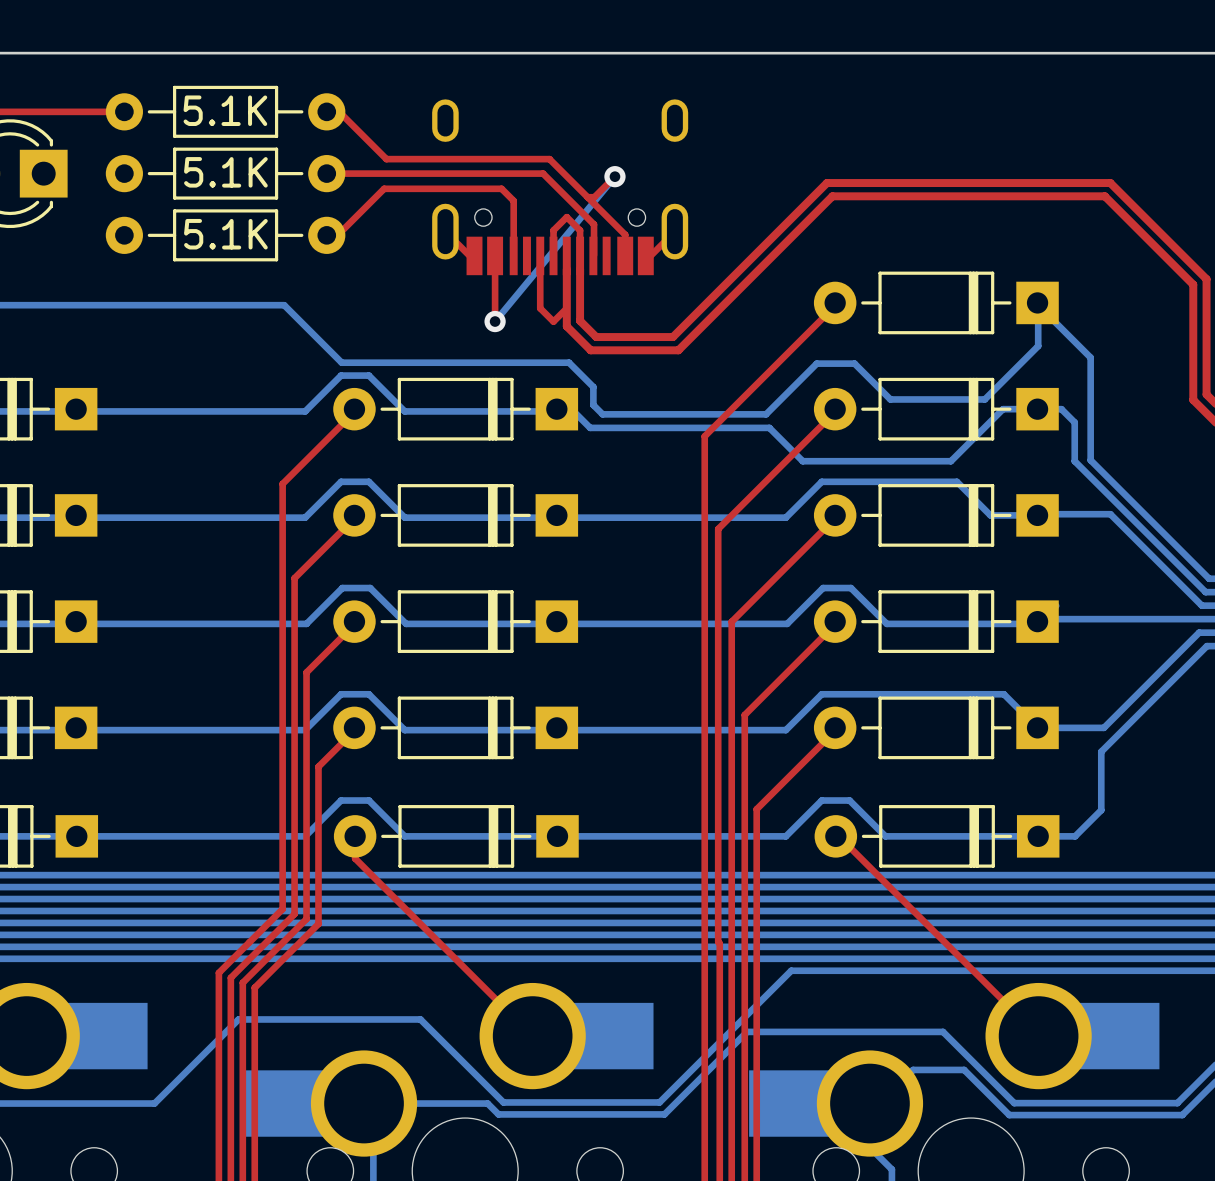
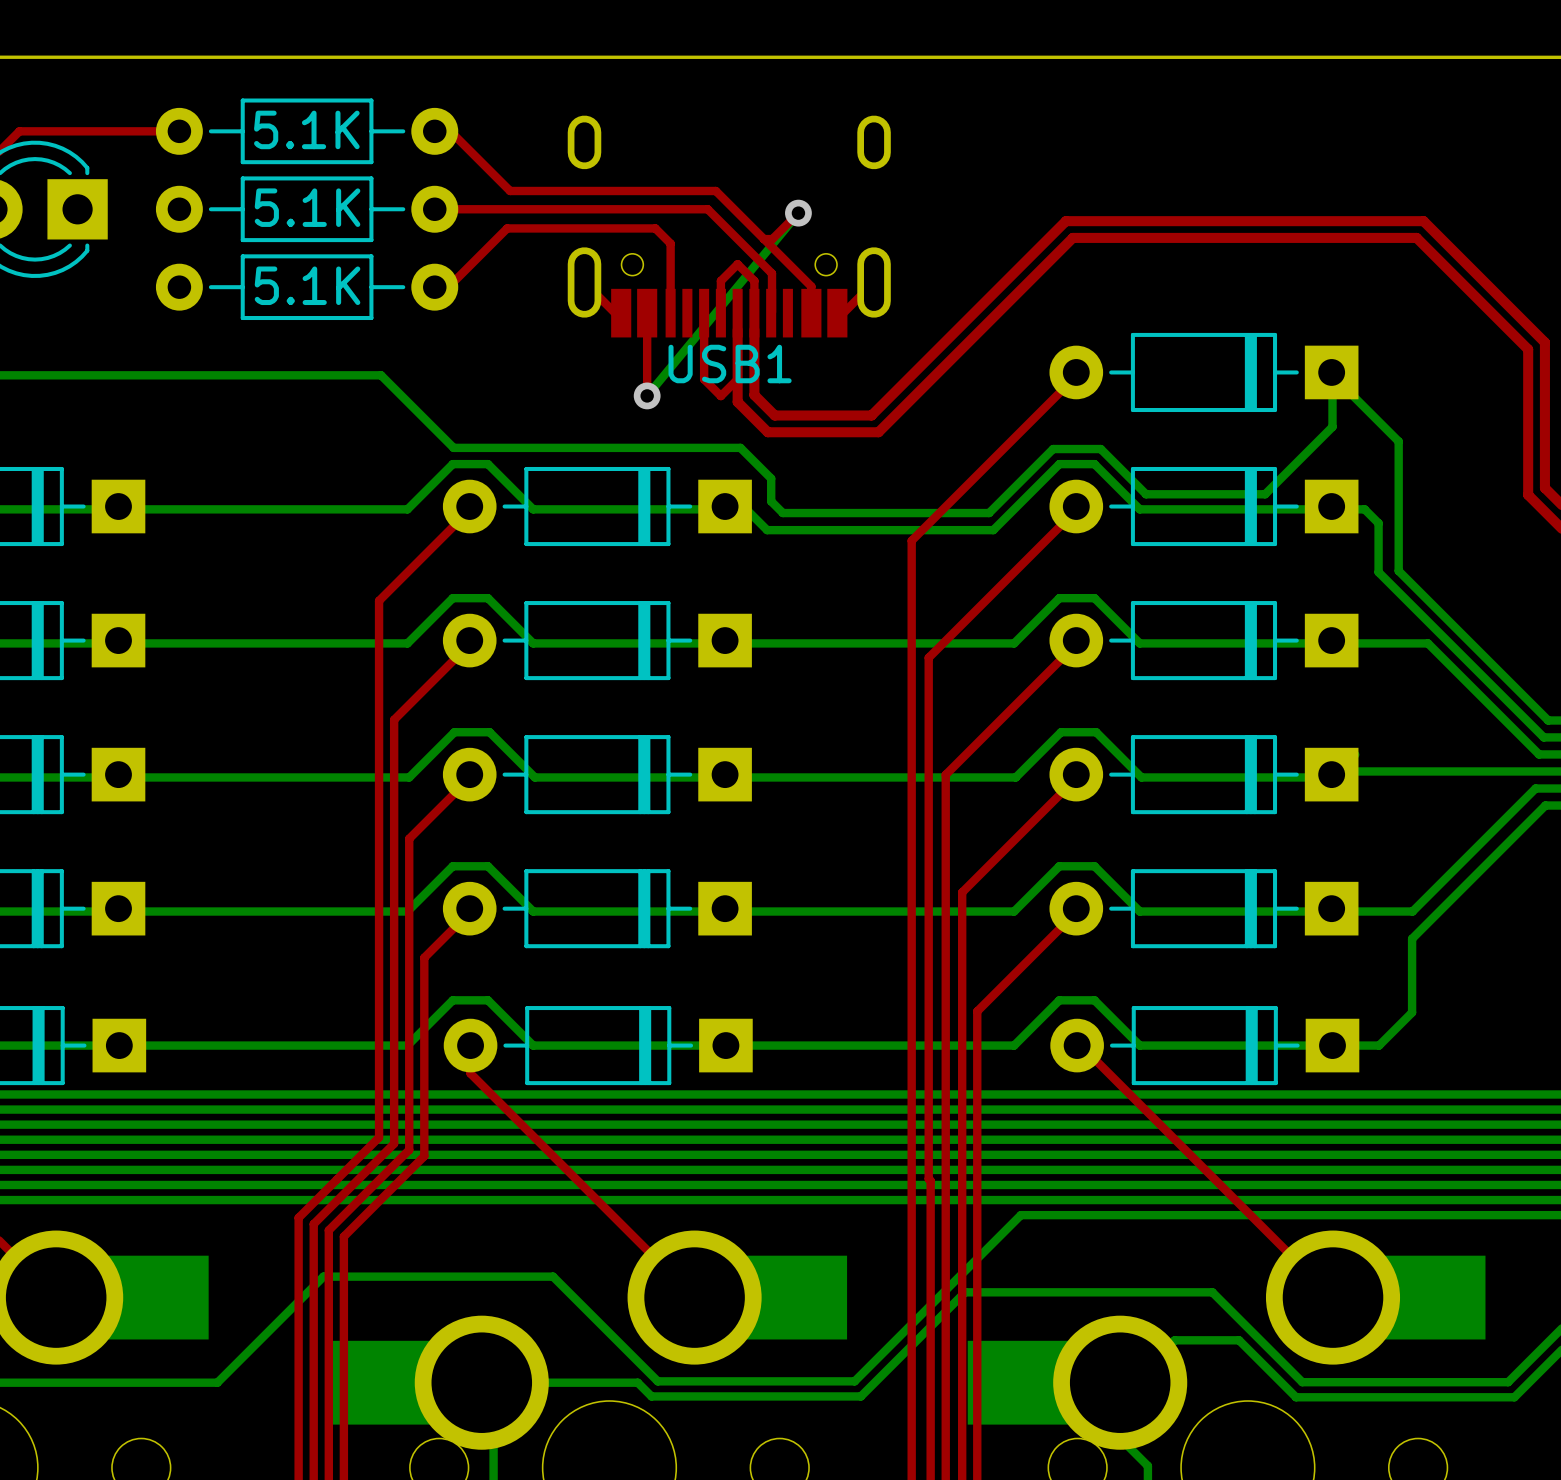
USB1 name: none -> USB1 (730, 364)
bottom track: (1063, 411) (1061, 409) (1003, 409) (950, 461) (802, 461) (769, 427) -> (1364, 509) (1139, 509) (1094, 464) (1059, 464) (993, 530)
bottom track: (849, 481) (956, 481) (990, 515) (1110, 514) (1113, 517) -> (1094, 598) (1139, 643) (1428, 643)
bottom track: (849, 694) (1003, 694) (1037, 727) (1103, 727) -> (1094, 866) (1139, 911) (1412, 911) (1415, 908)

